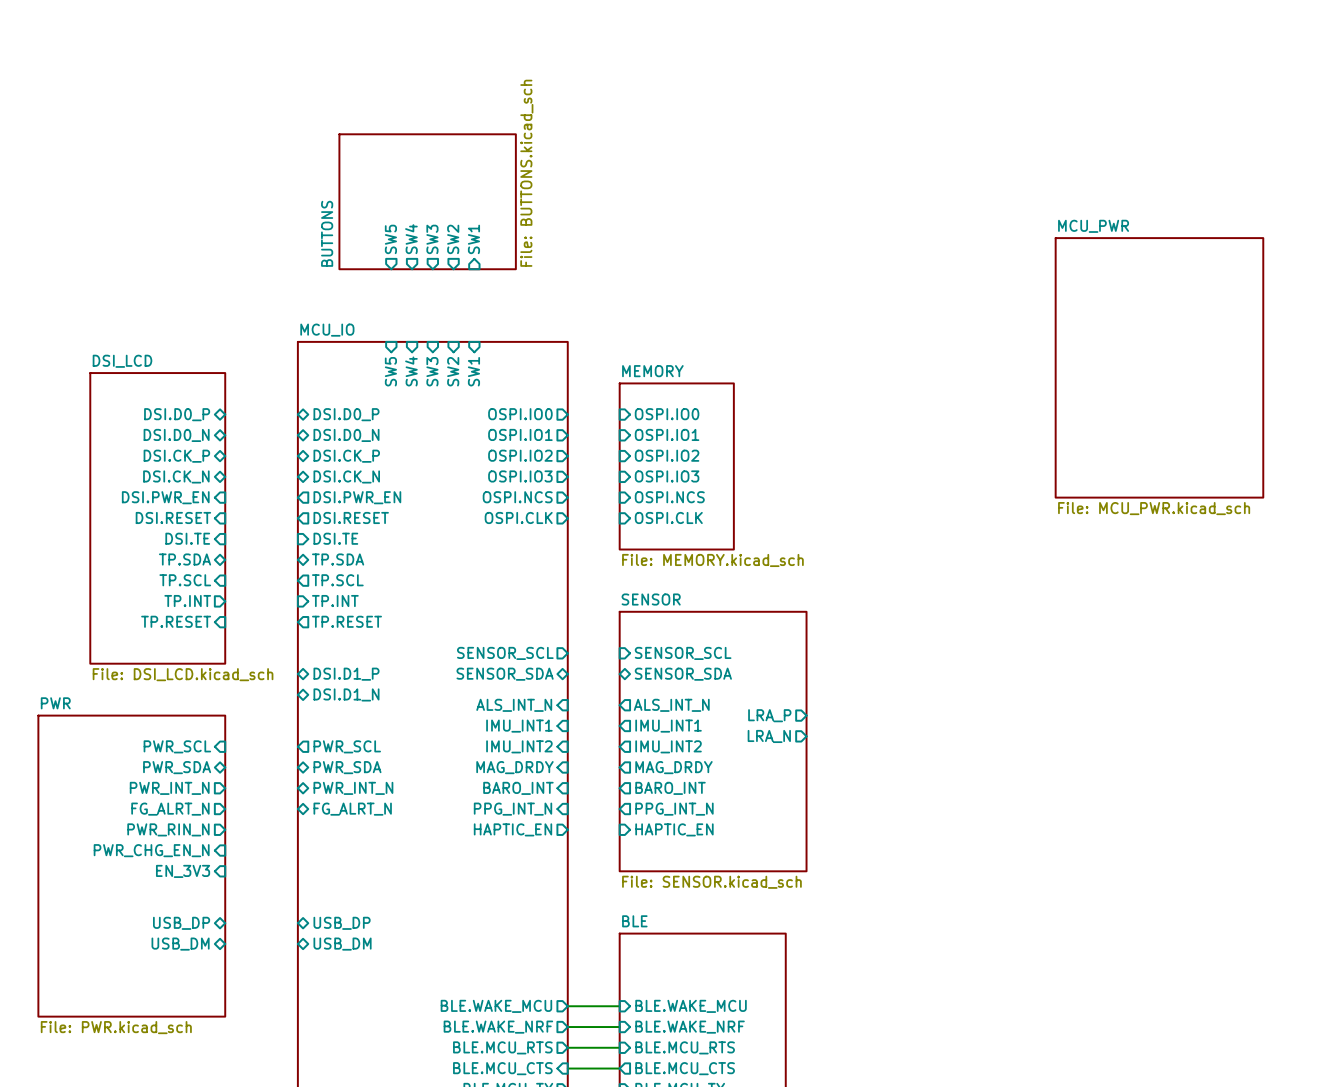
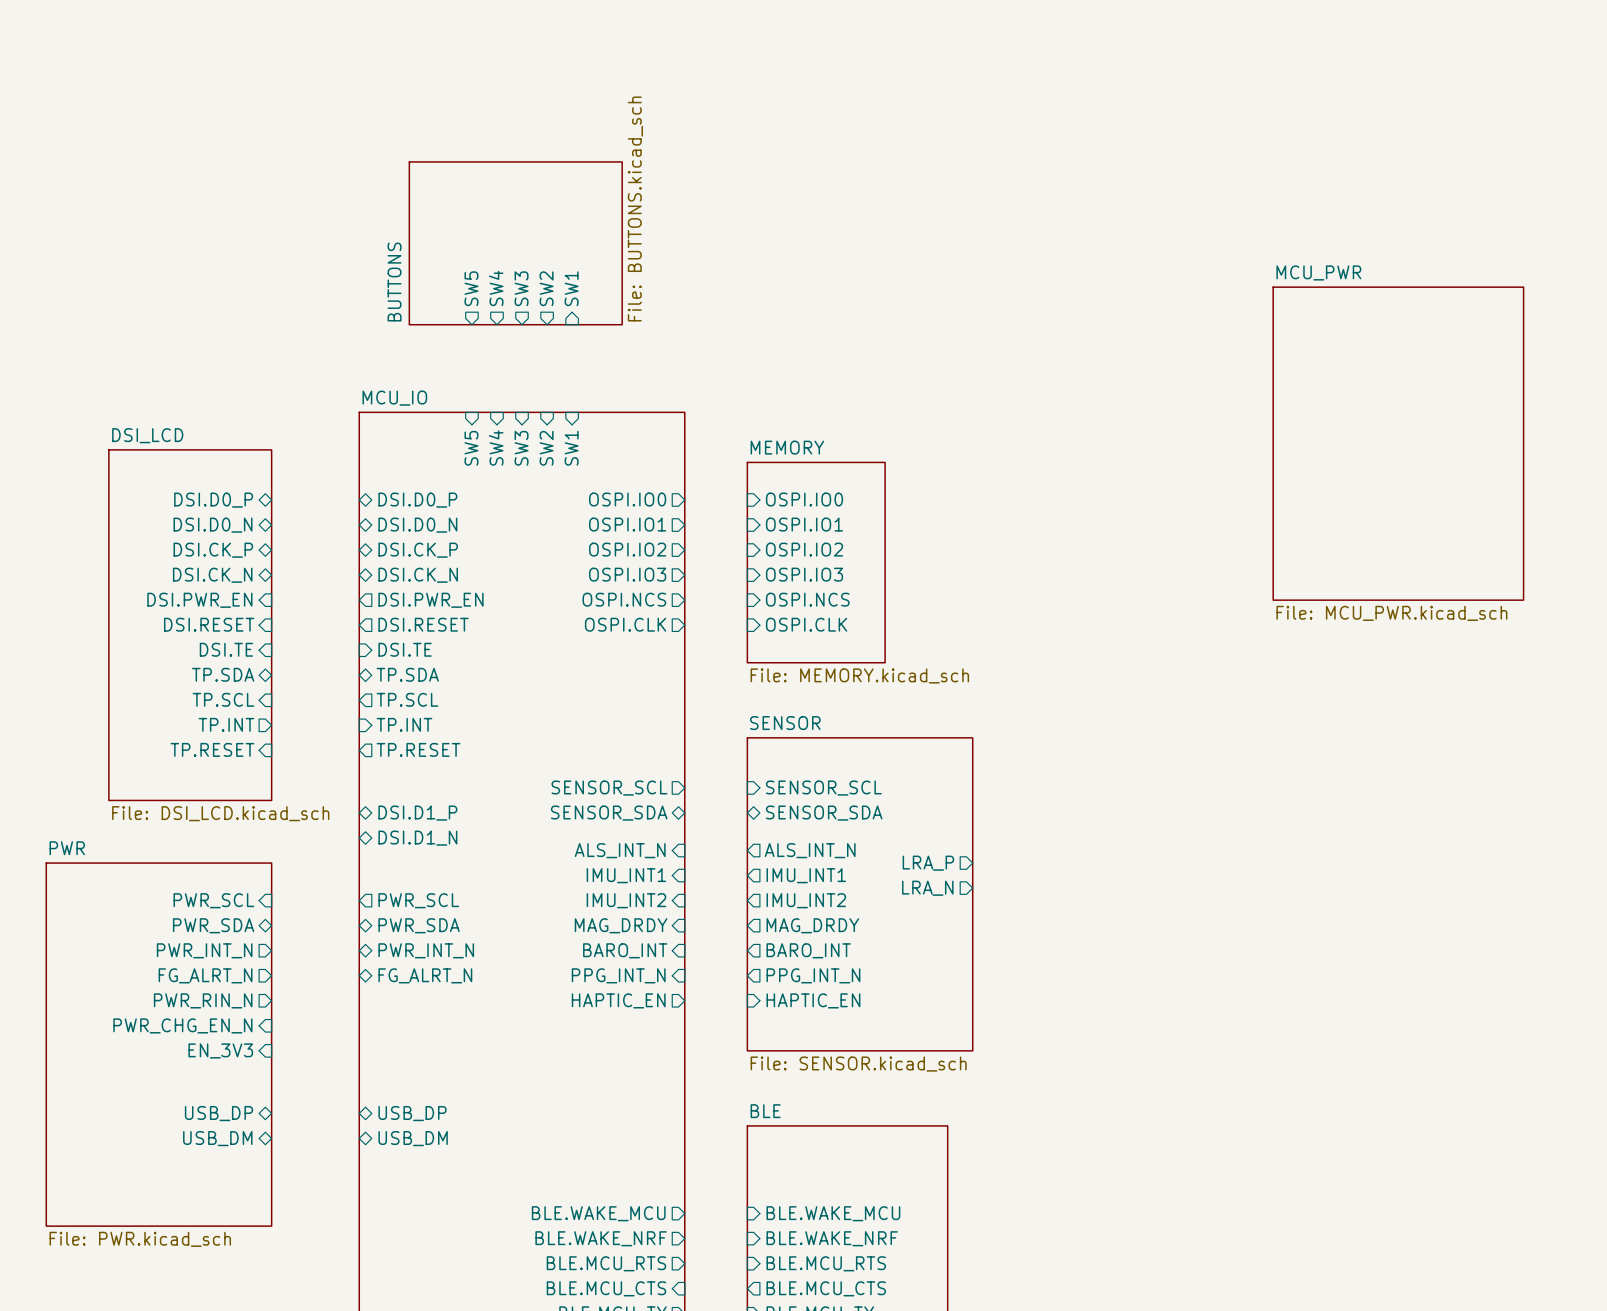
wire: (567, 1006) (619, 1006) -> none
wire: (567, 1027) (619, 1027) -> none
wire: (567, 1047) (619, 1047) -> none
wire: (567, 1068) (619, 1068) -> none

